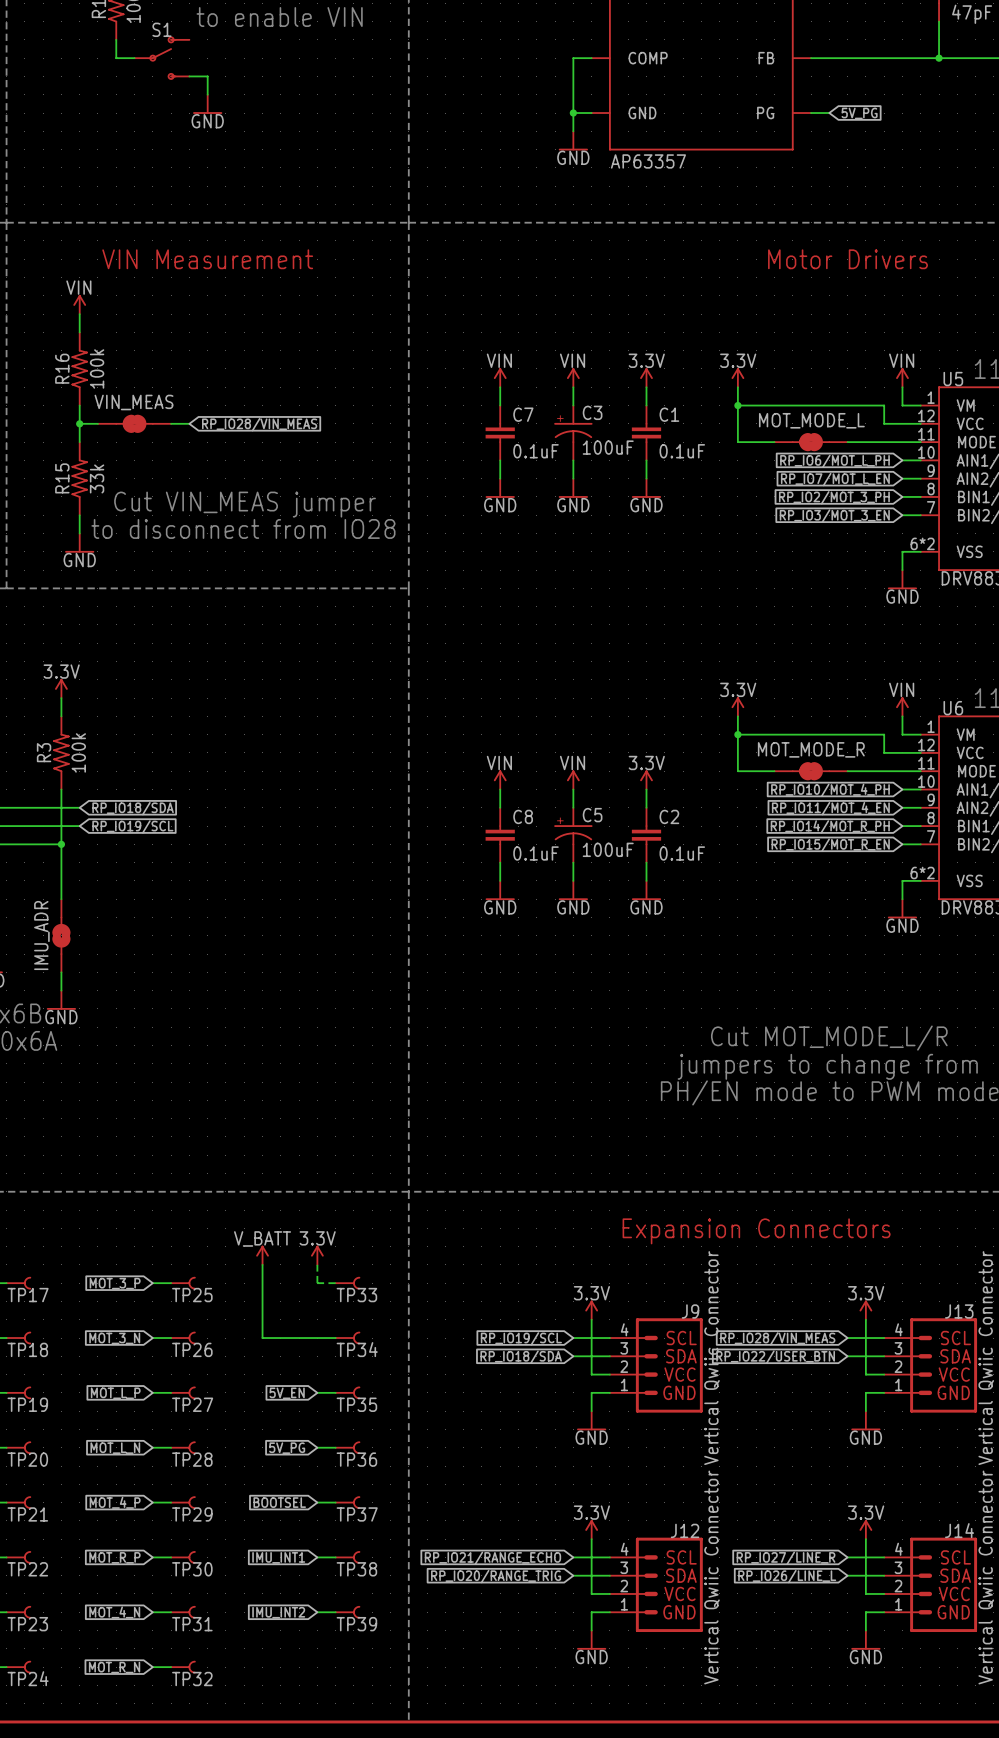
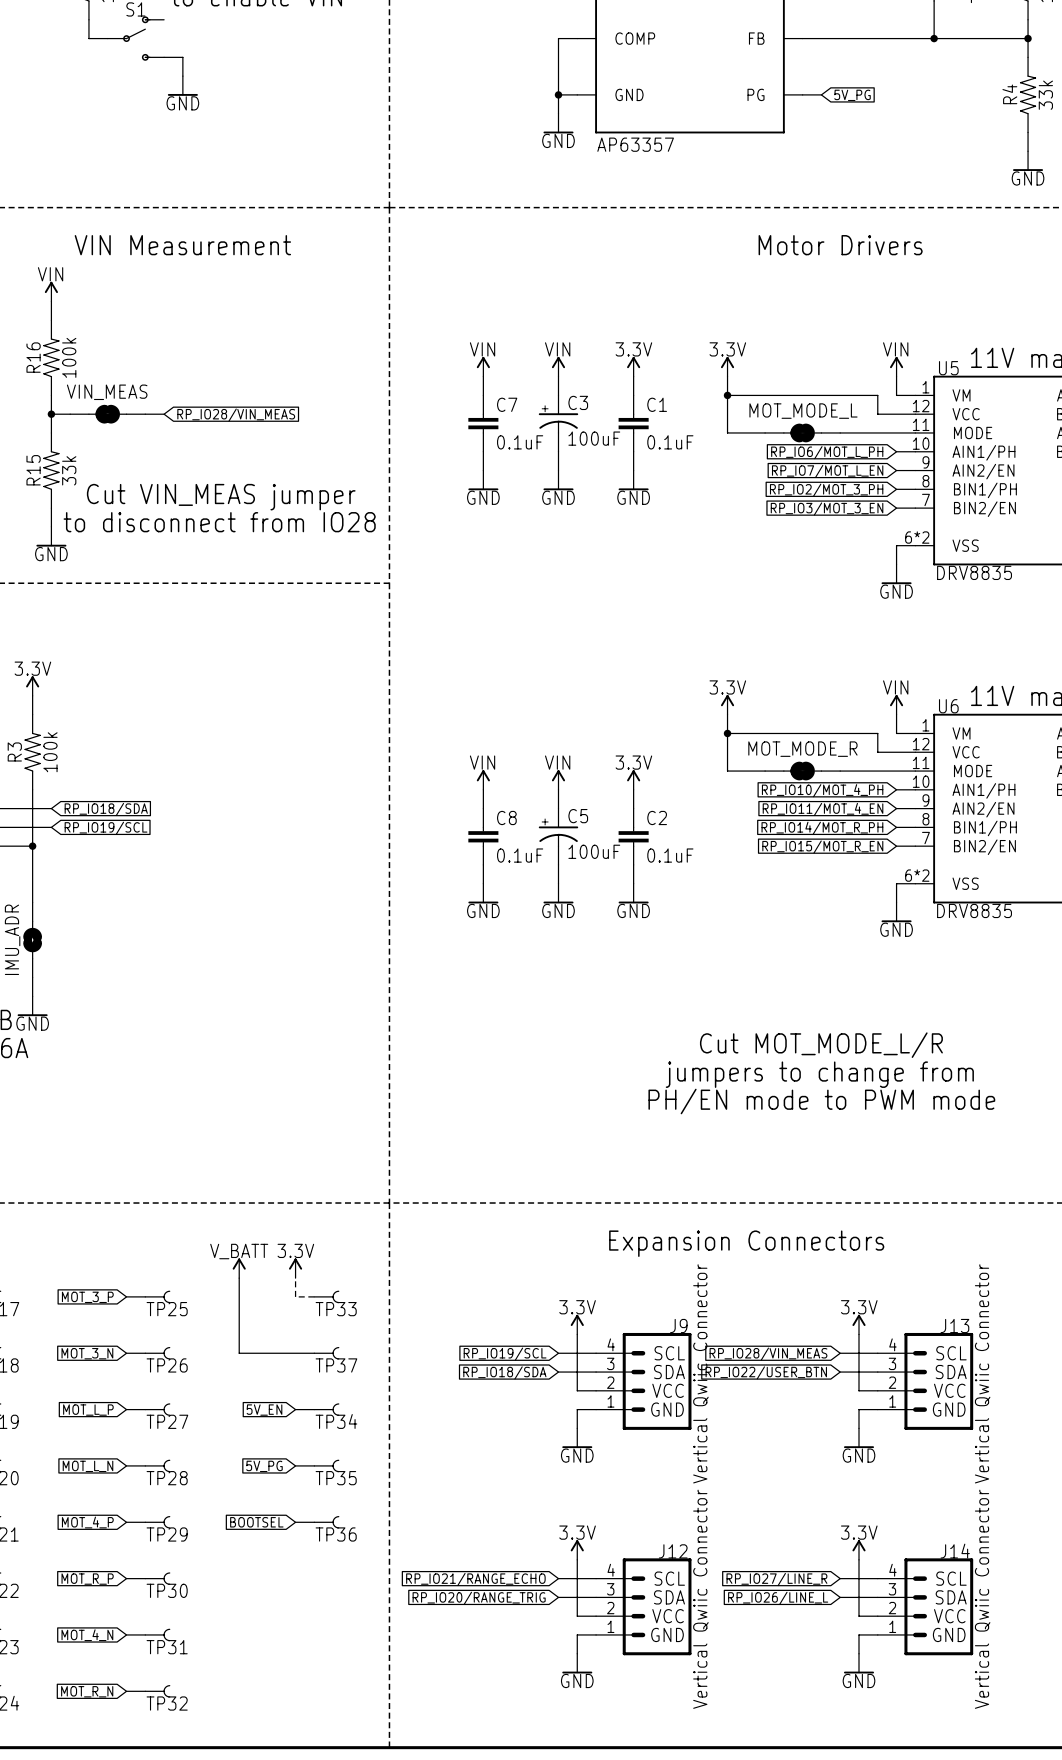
TP34 name: TP34 (357, 1349) -> TP37 (336, 1365)
TP35 name: TP35 (356, 1404) -> TP34 (336, 1421)
TP36 name: TP36 (356, 1459) -> TP35 (336, 1478)
TP37 name: TP37 (357, 1514) -> TP36 (336, 1534)
global label: IMU_INT1 (278, 1557) -> none
wire: (317, 1557) (335, 1557) -> none
TP38: (347, 1557) -> none
global label: IMU_INT2 (278, 1612) -> none
wire: (317, 1612) (335, 1612) -> none
TP39: (347, 1612) -> none

